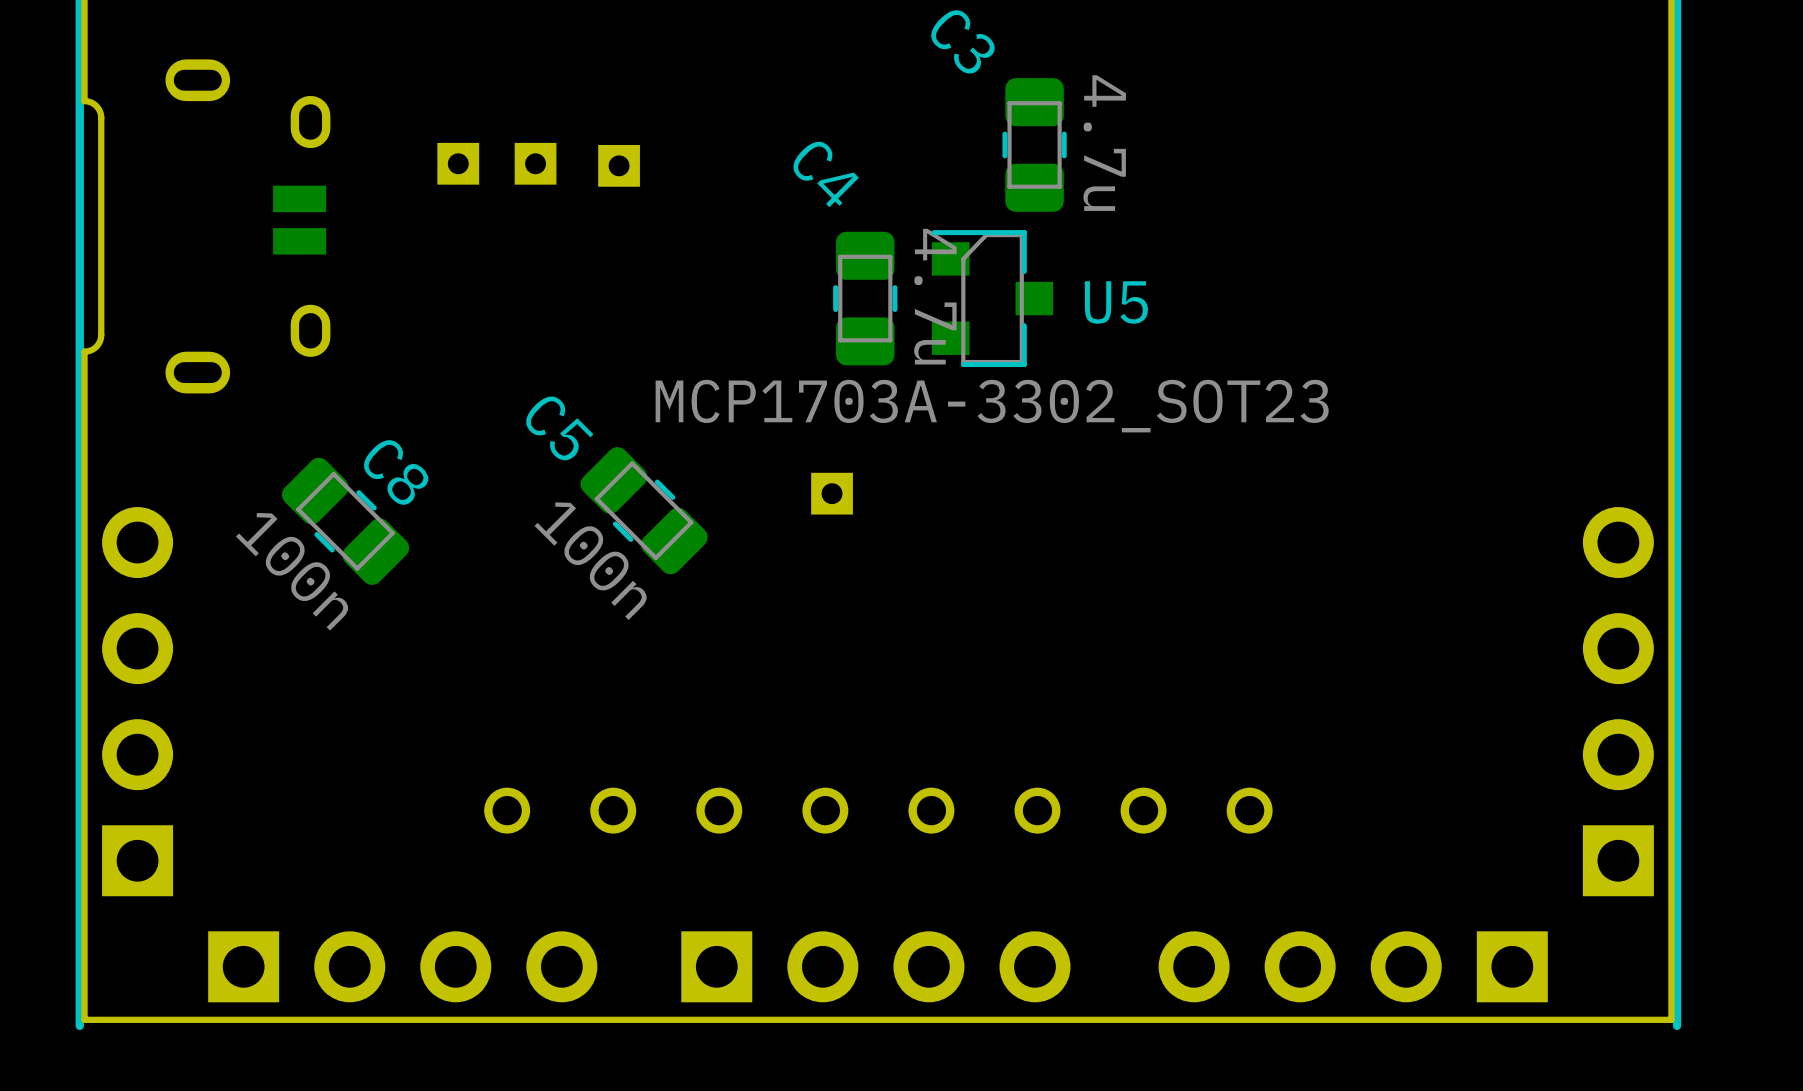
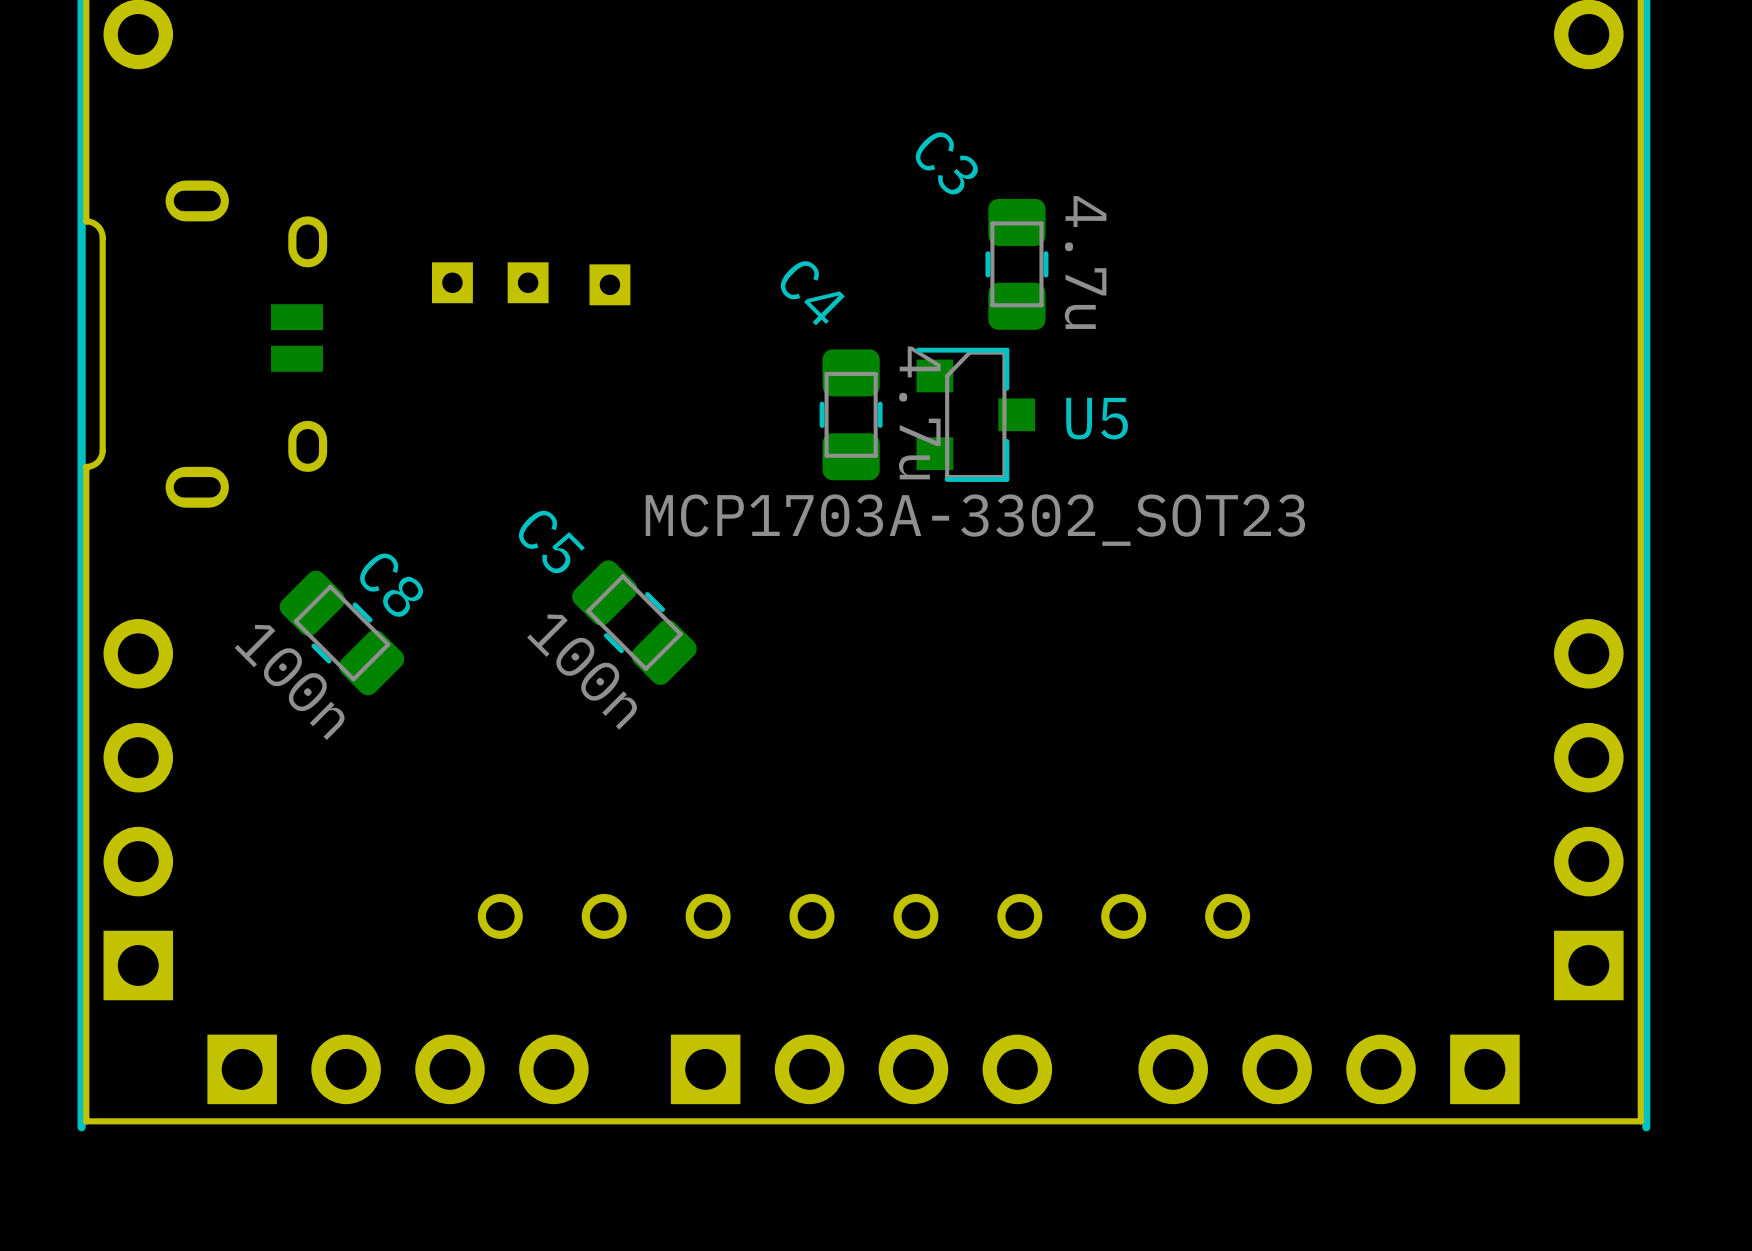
part: (832, 493) -> none

